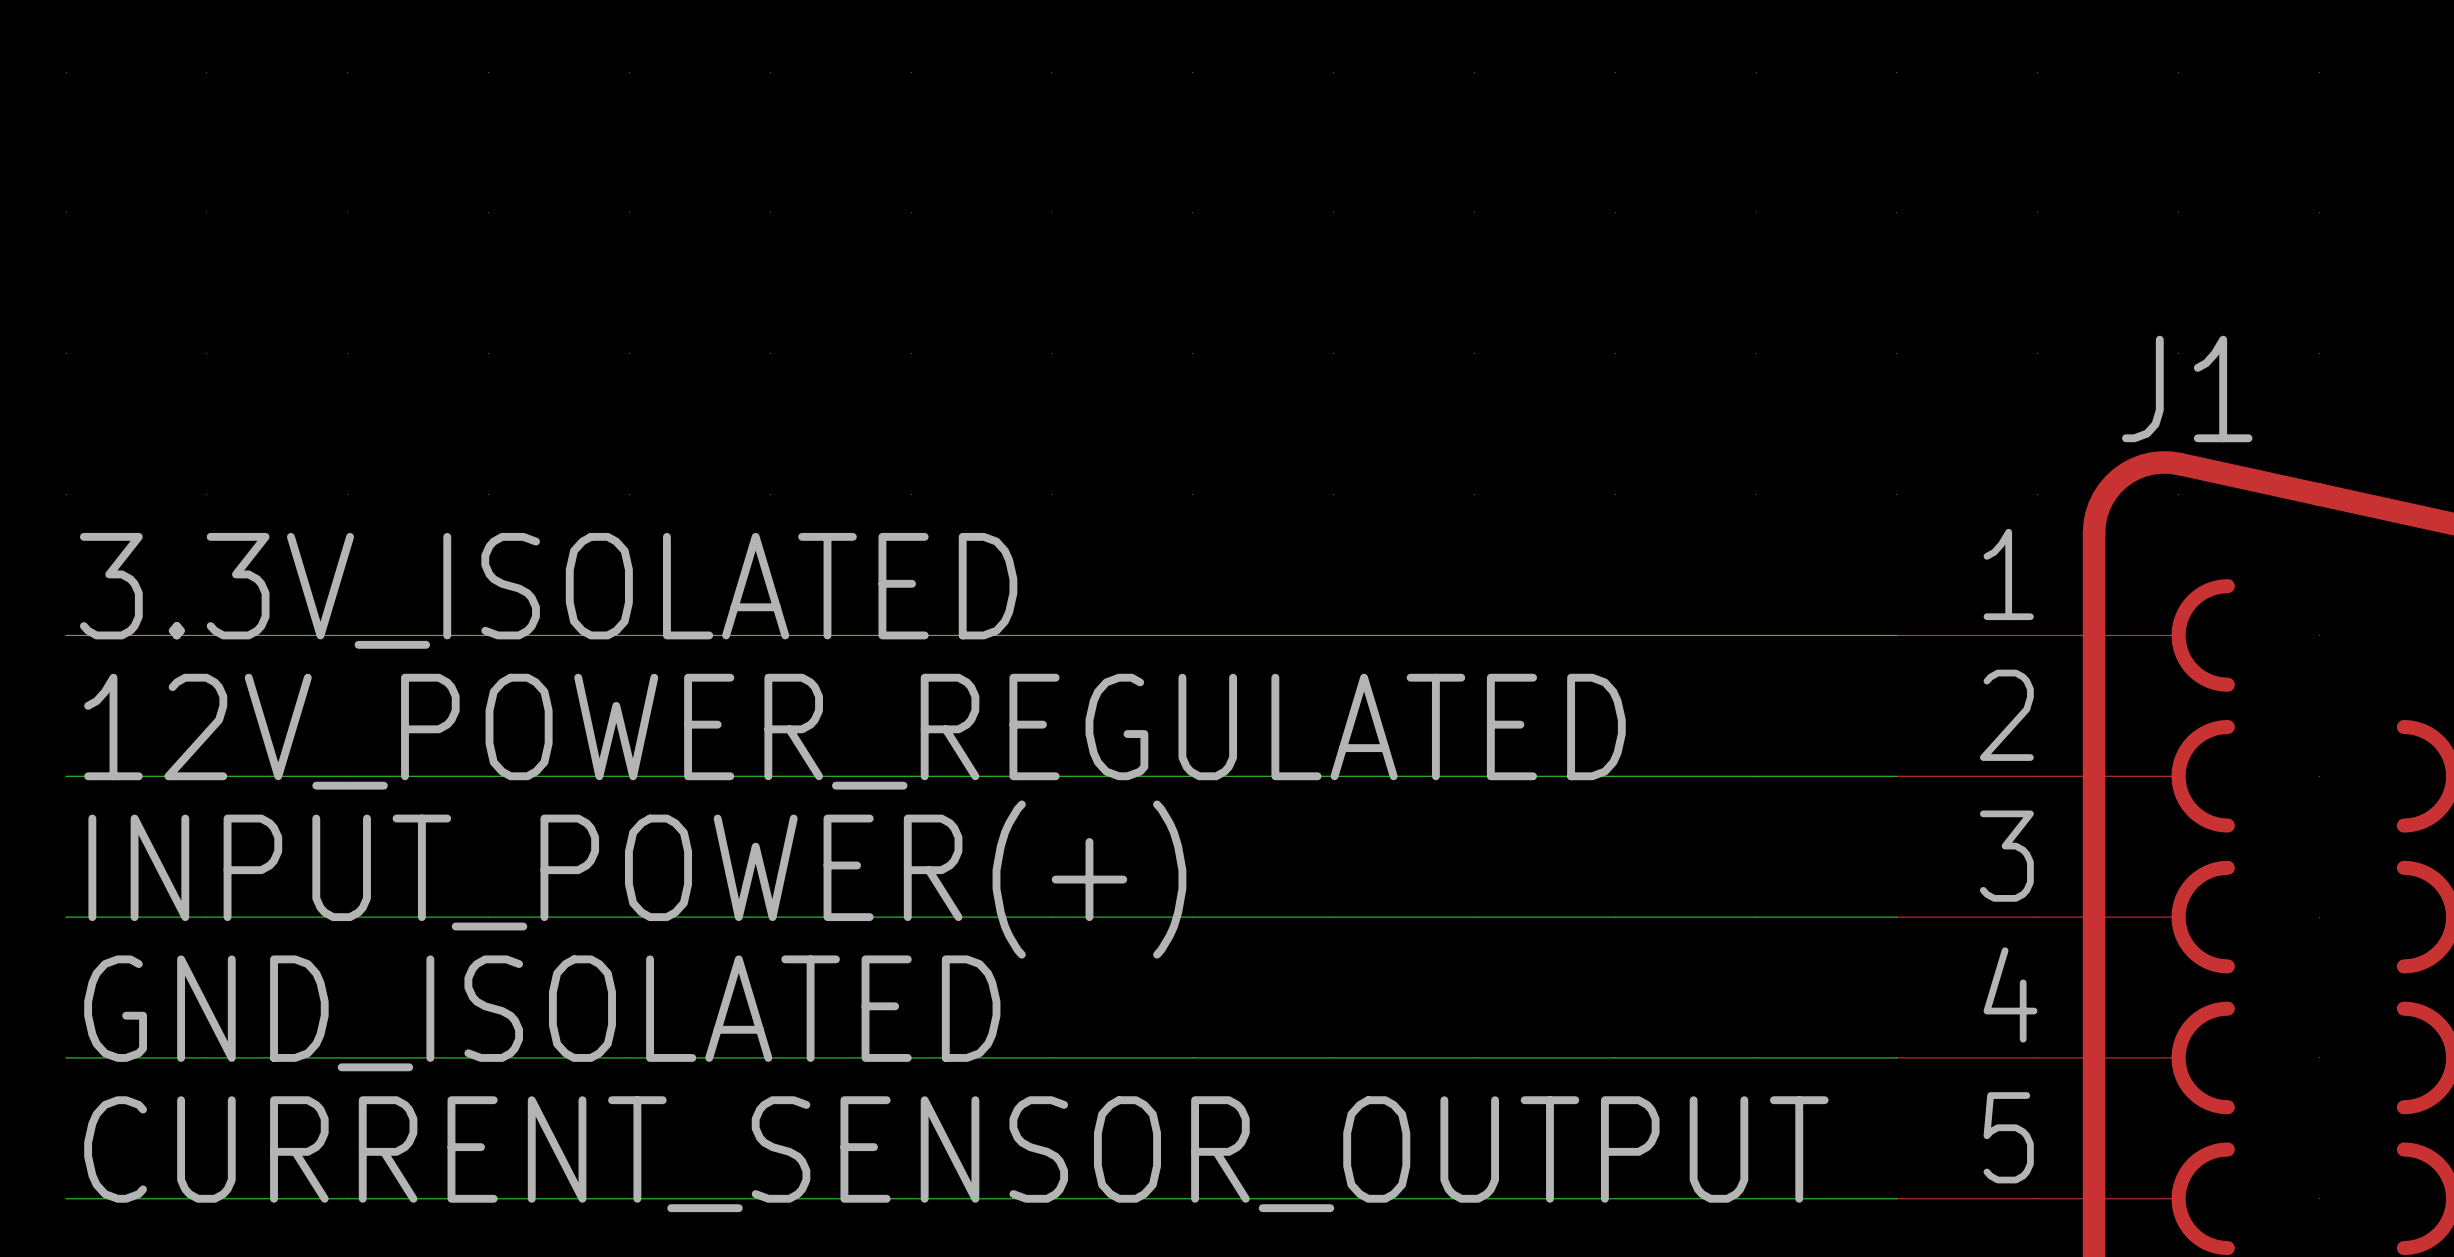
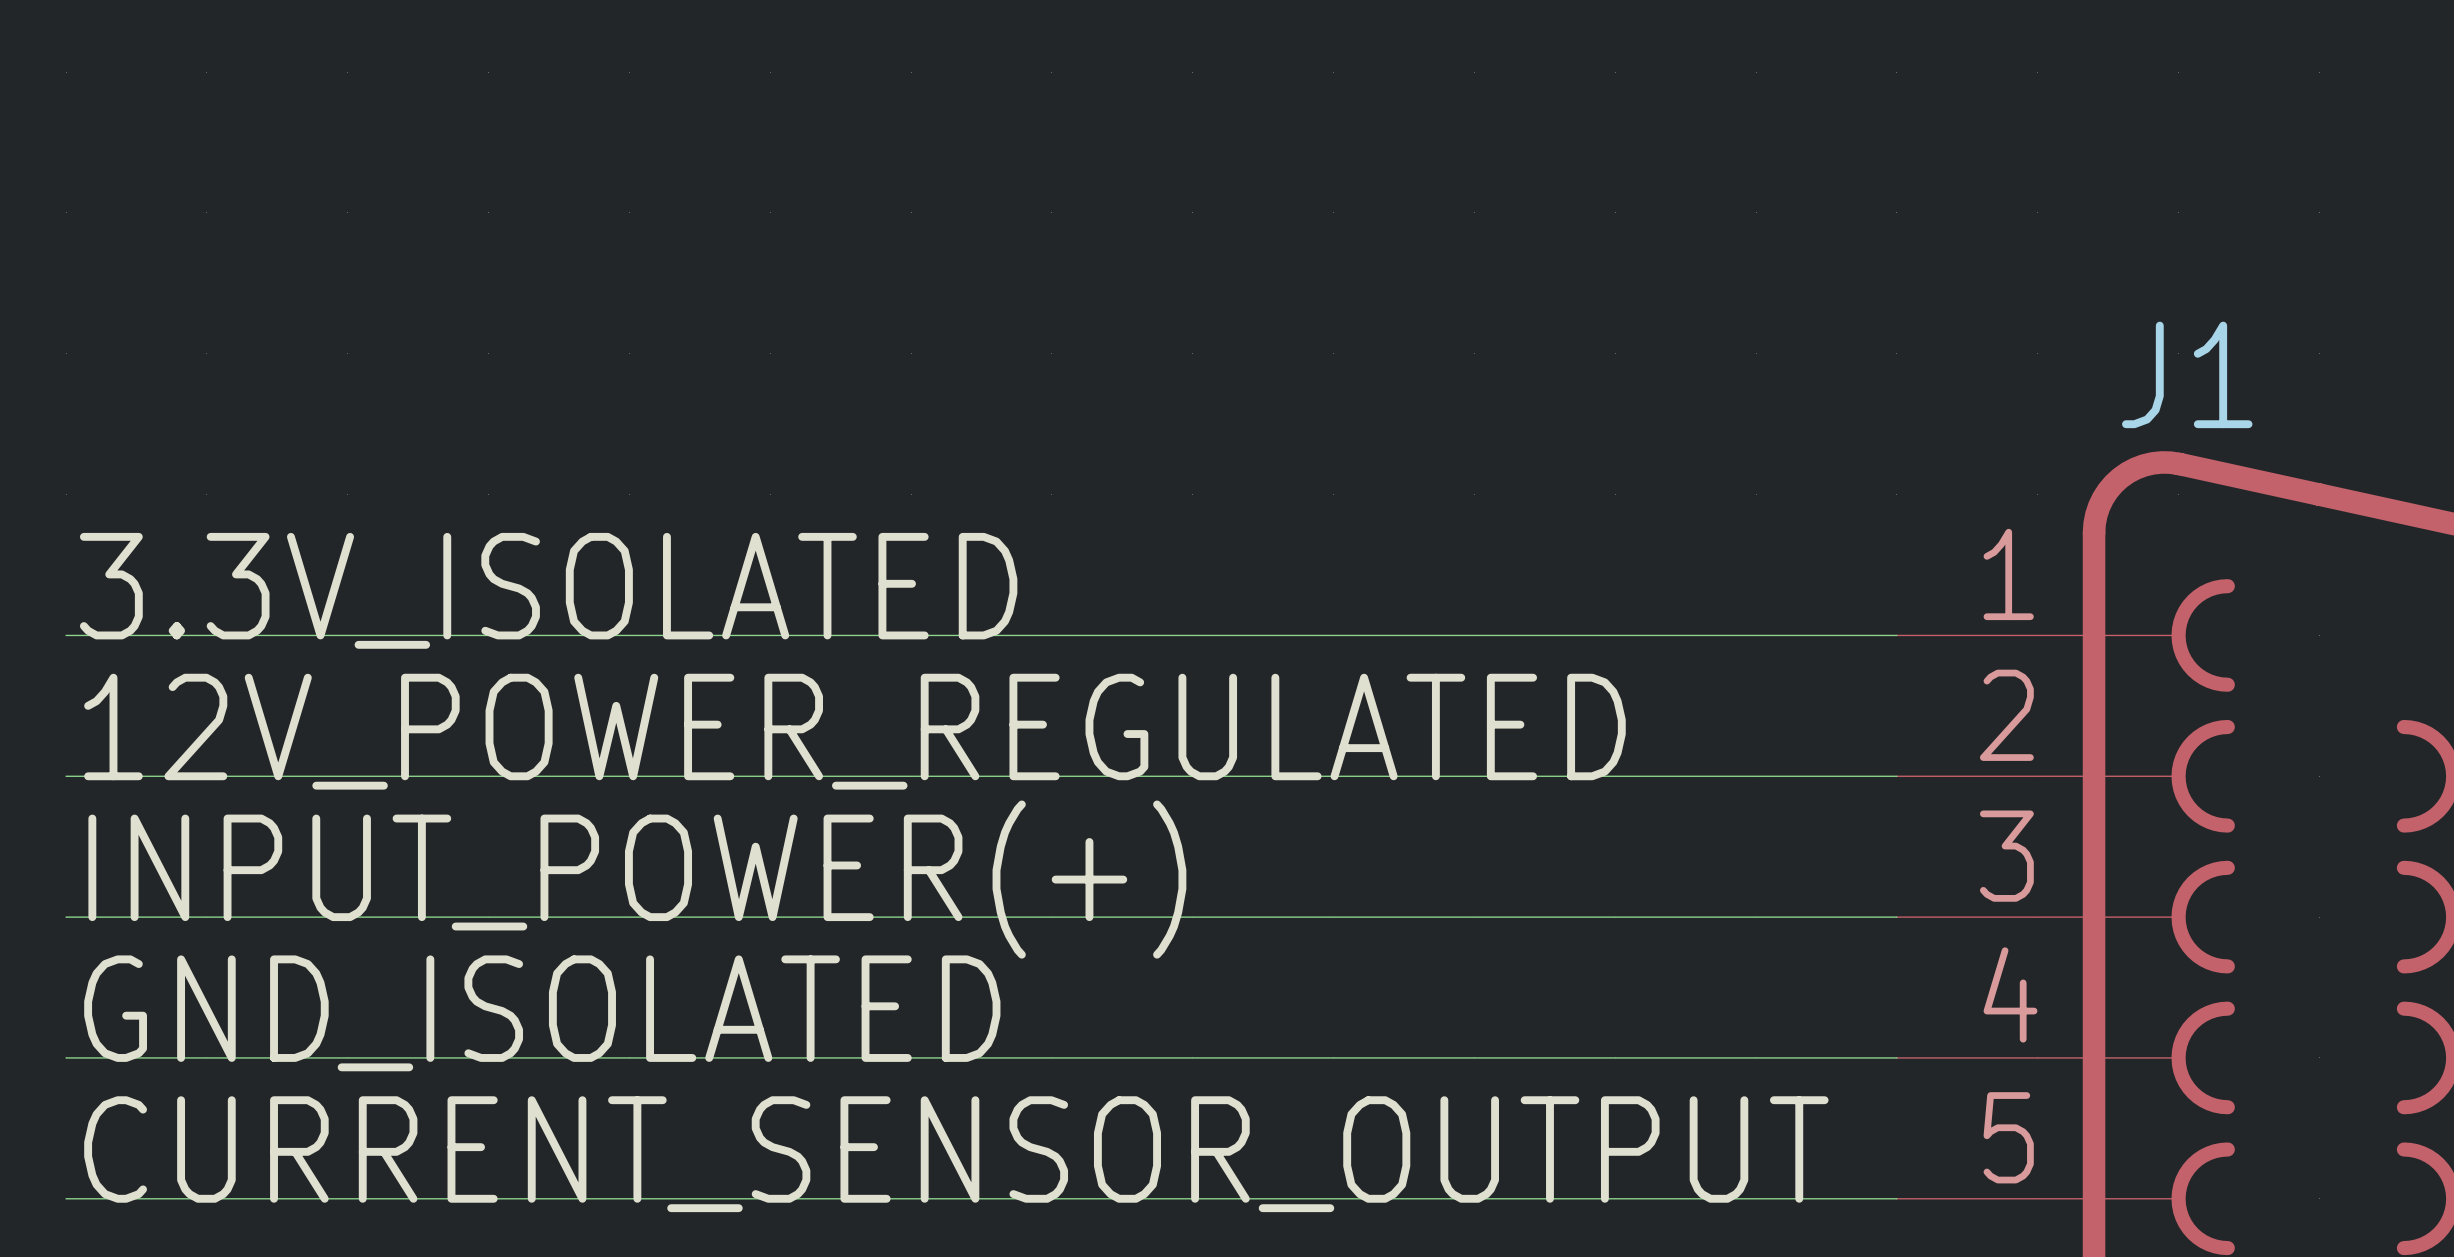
J1 name position: J1 (2187, 388) -> J1 (2187, 374)

